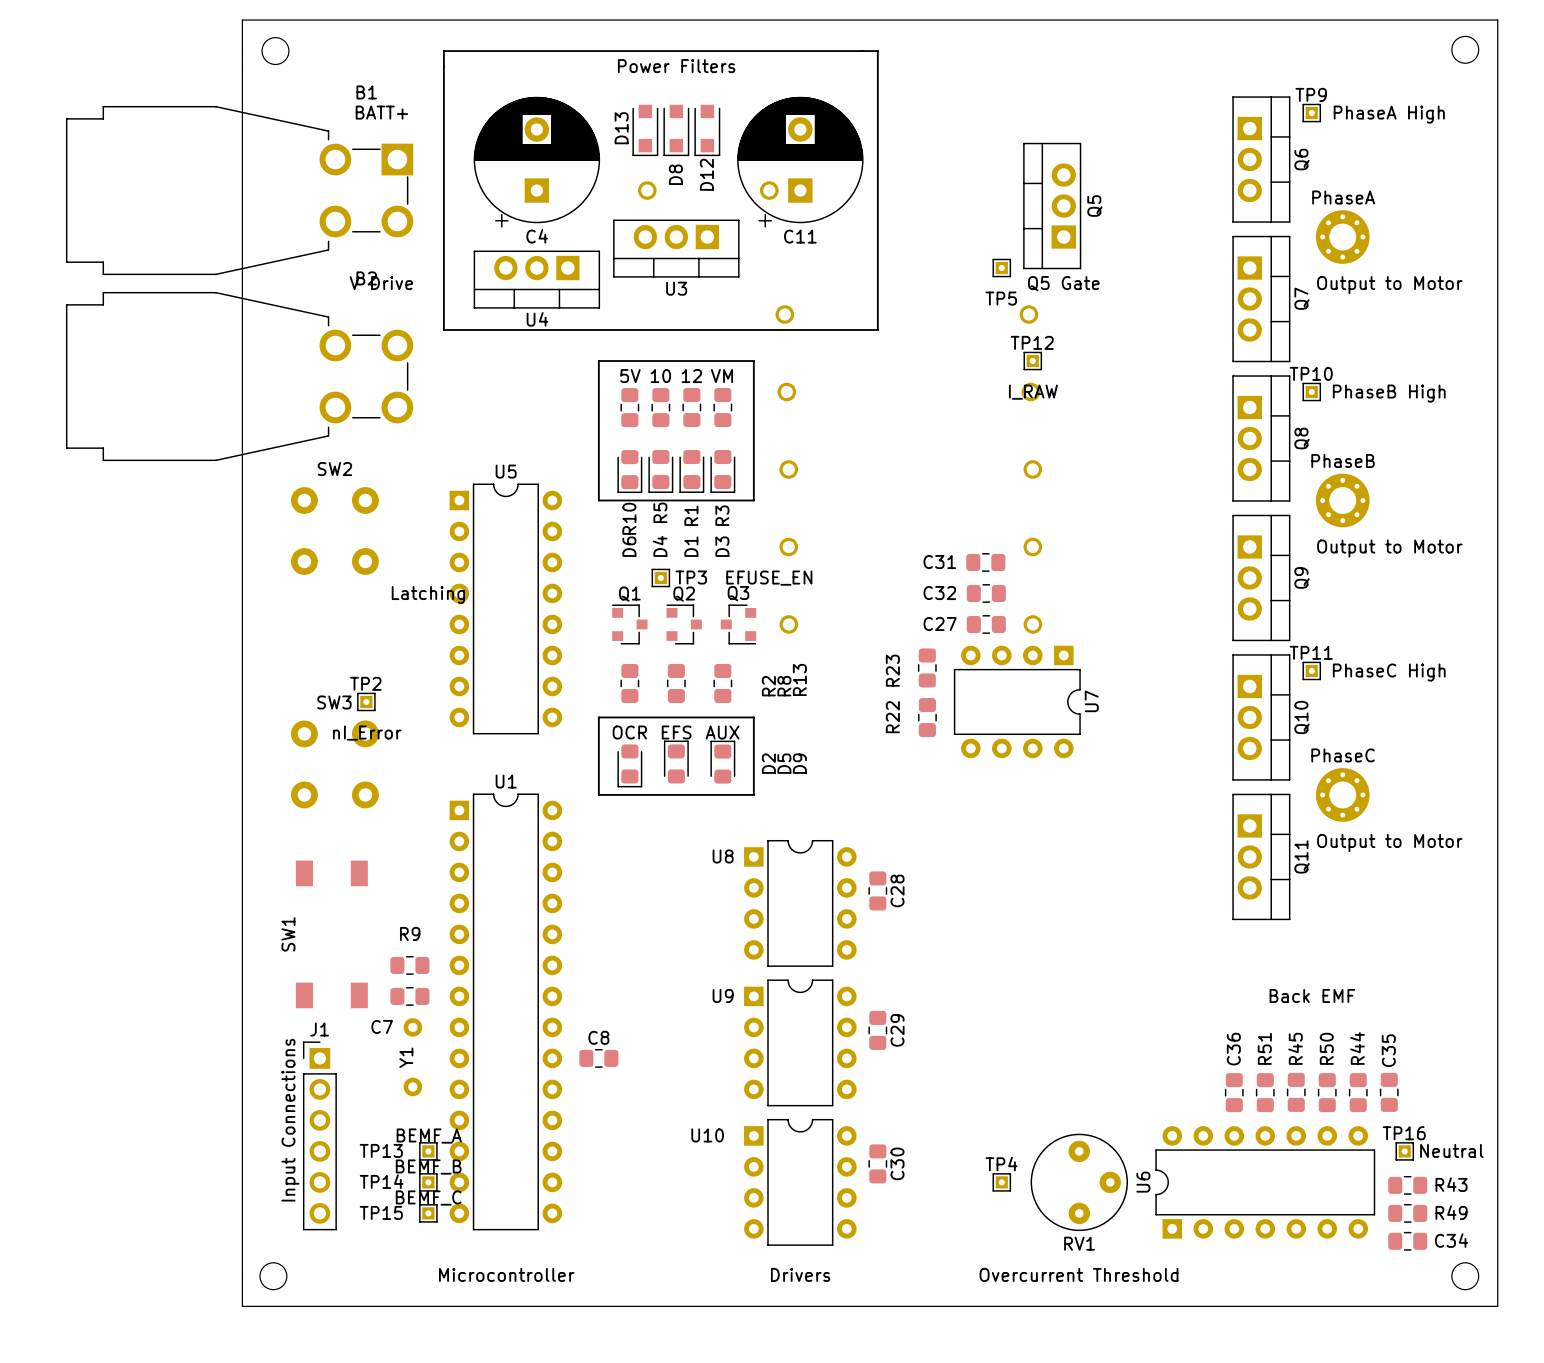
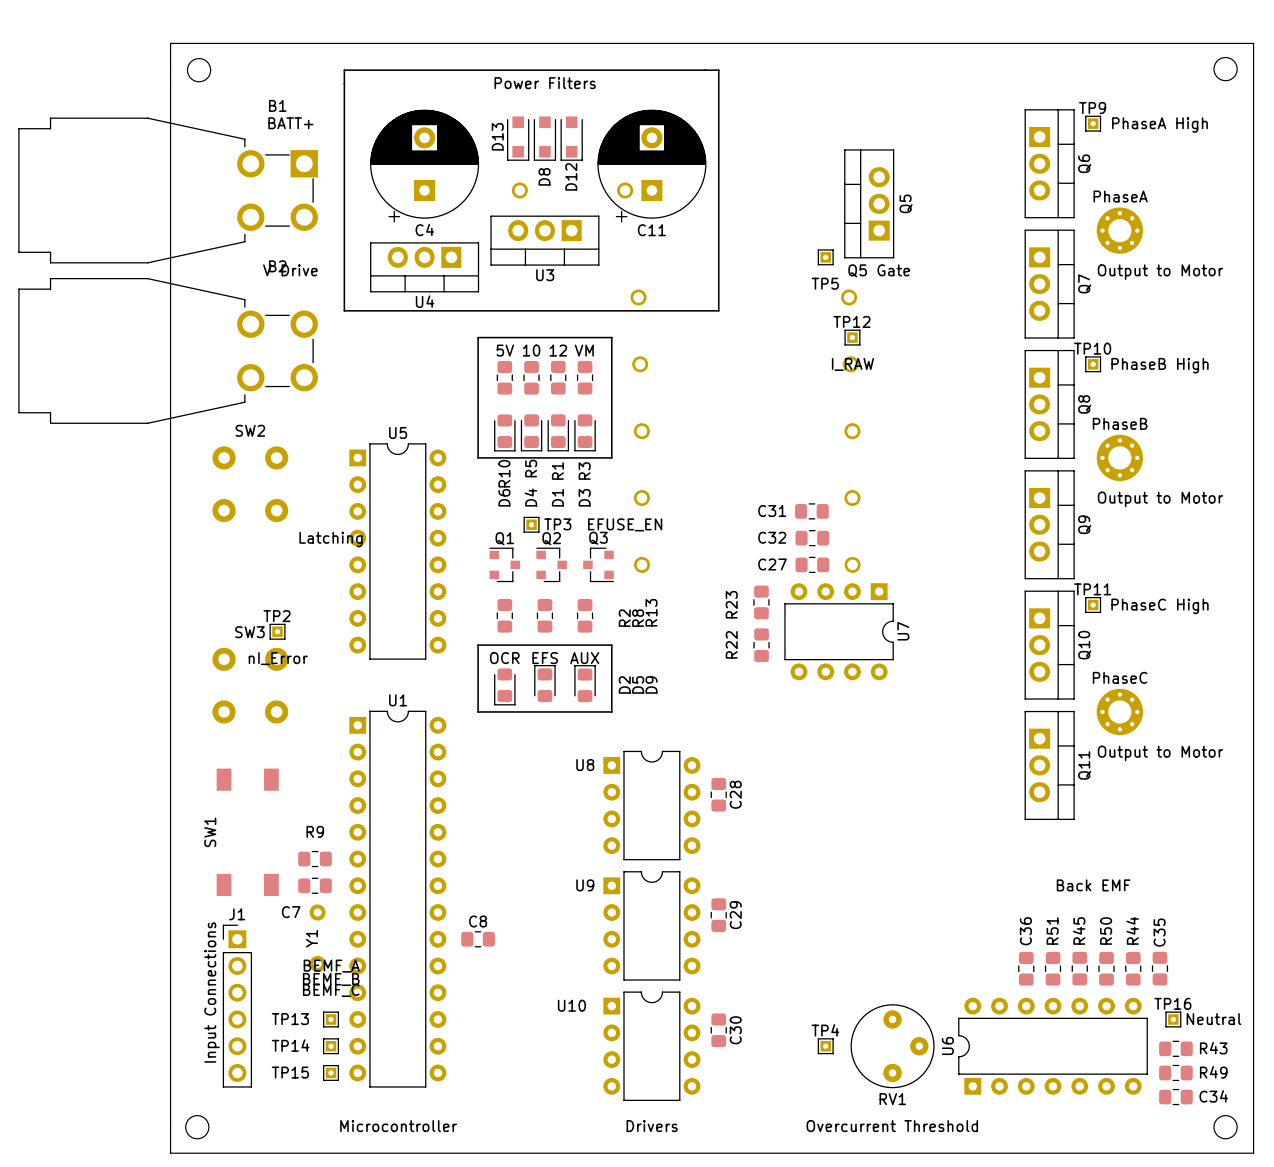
text position: BEMF_A (429, 1136) -> BEMF_A (331, 966)
text position: BEMF_B (428, 1167) -> BEMF_B (331, 979)
text position: BEMF_C (428, 1198) -> BEMF_C (331, 990)

